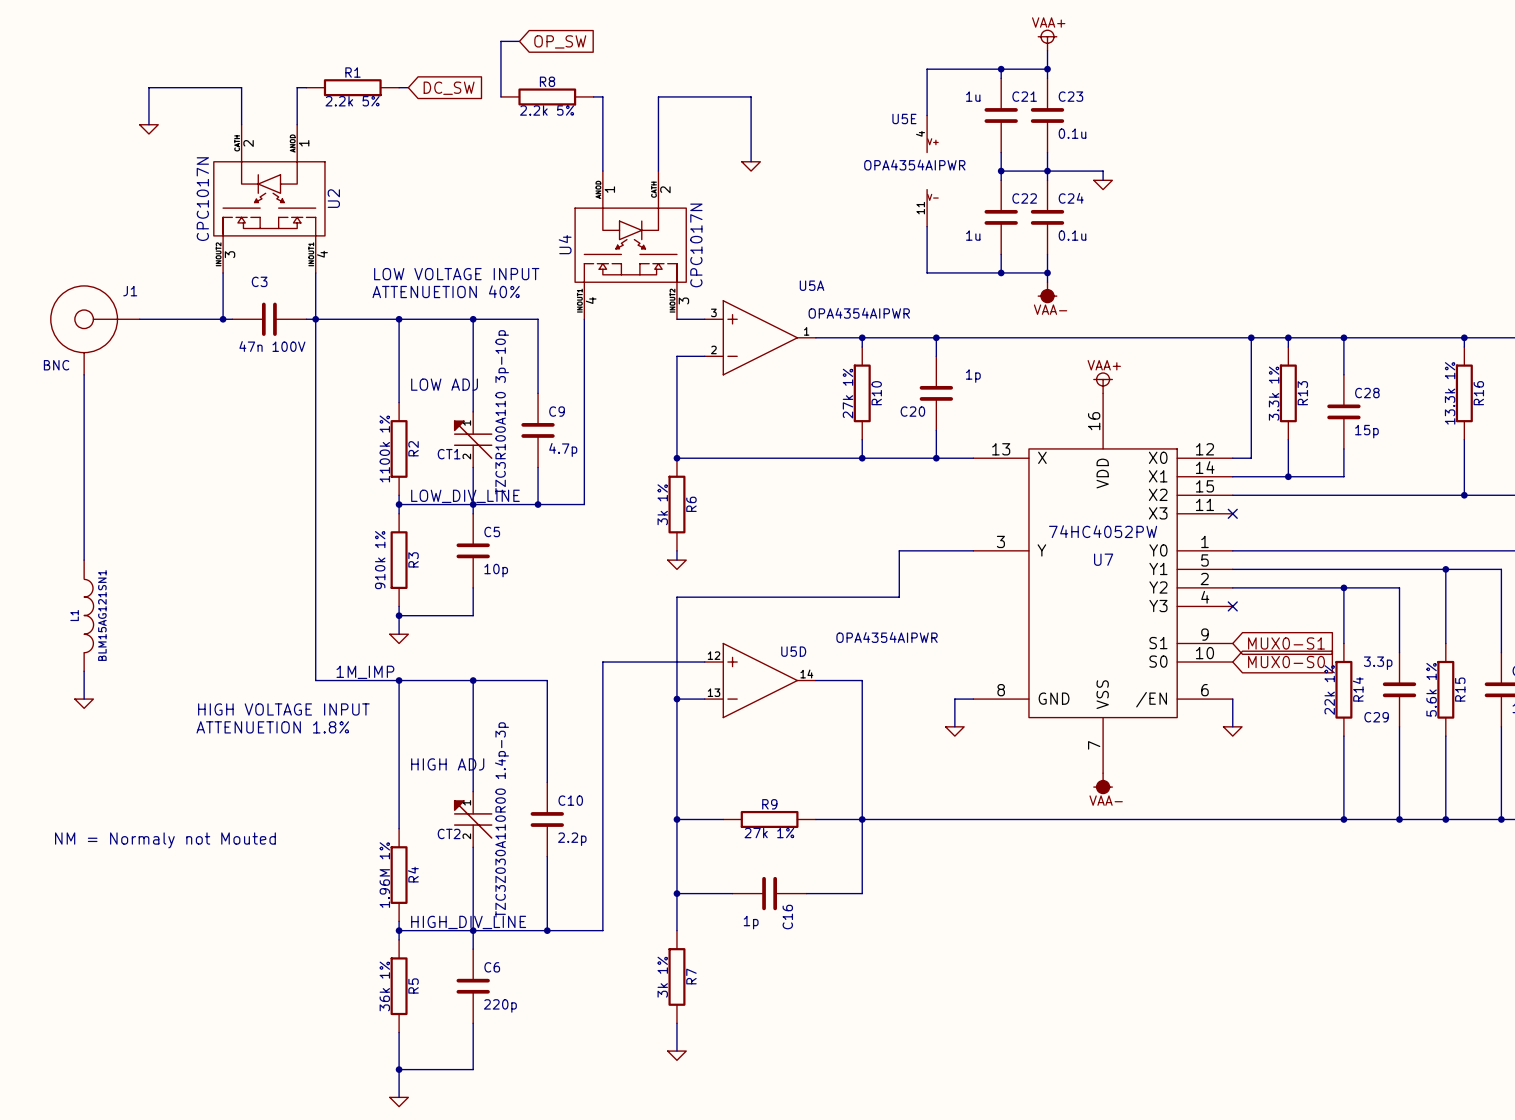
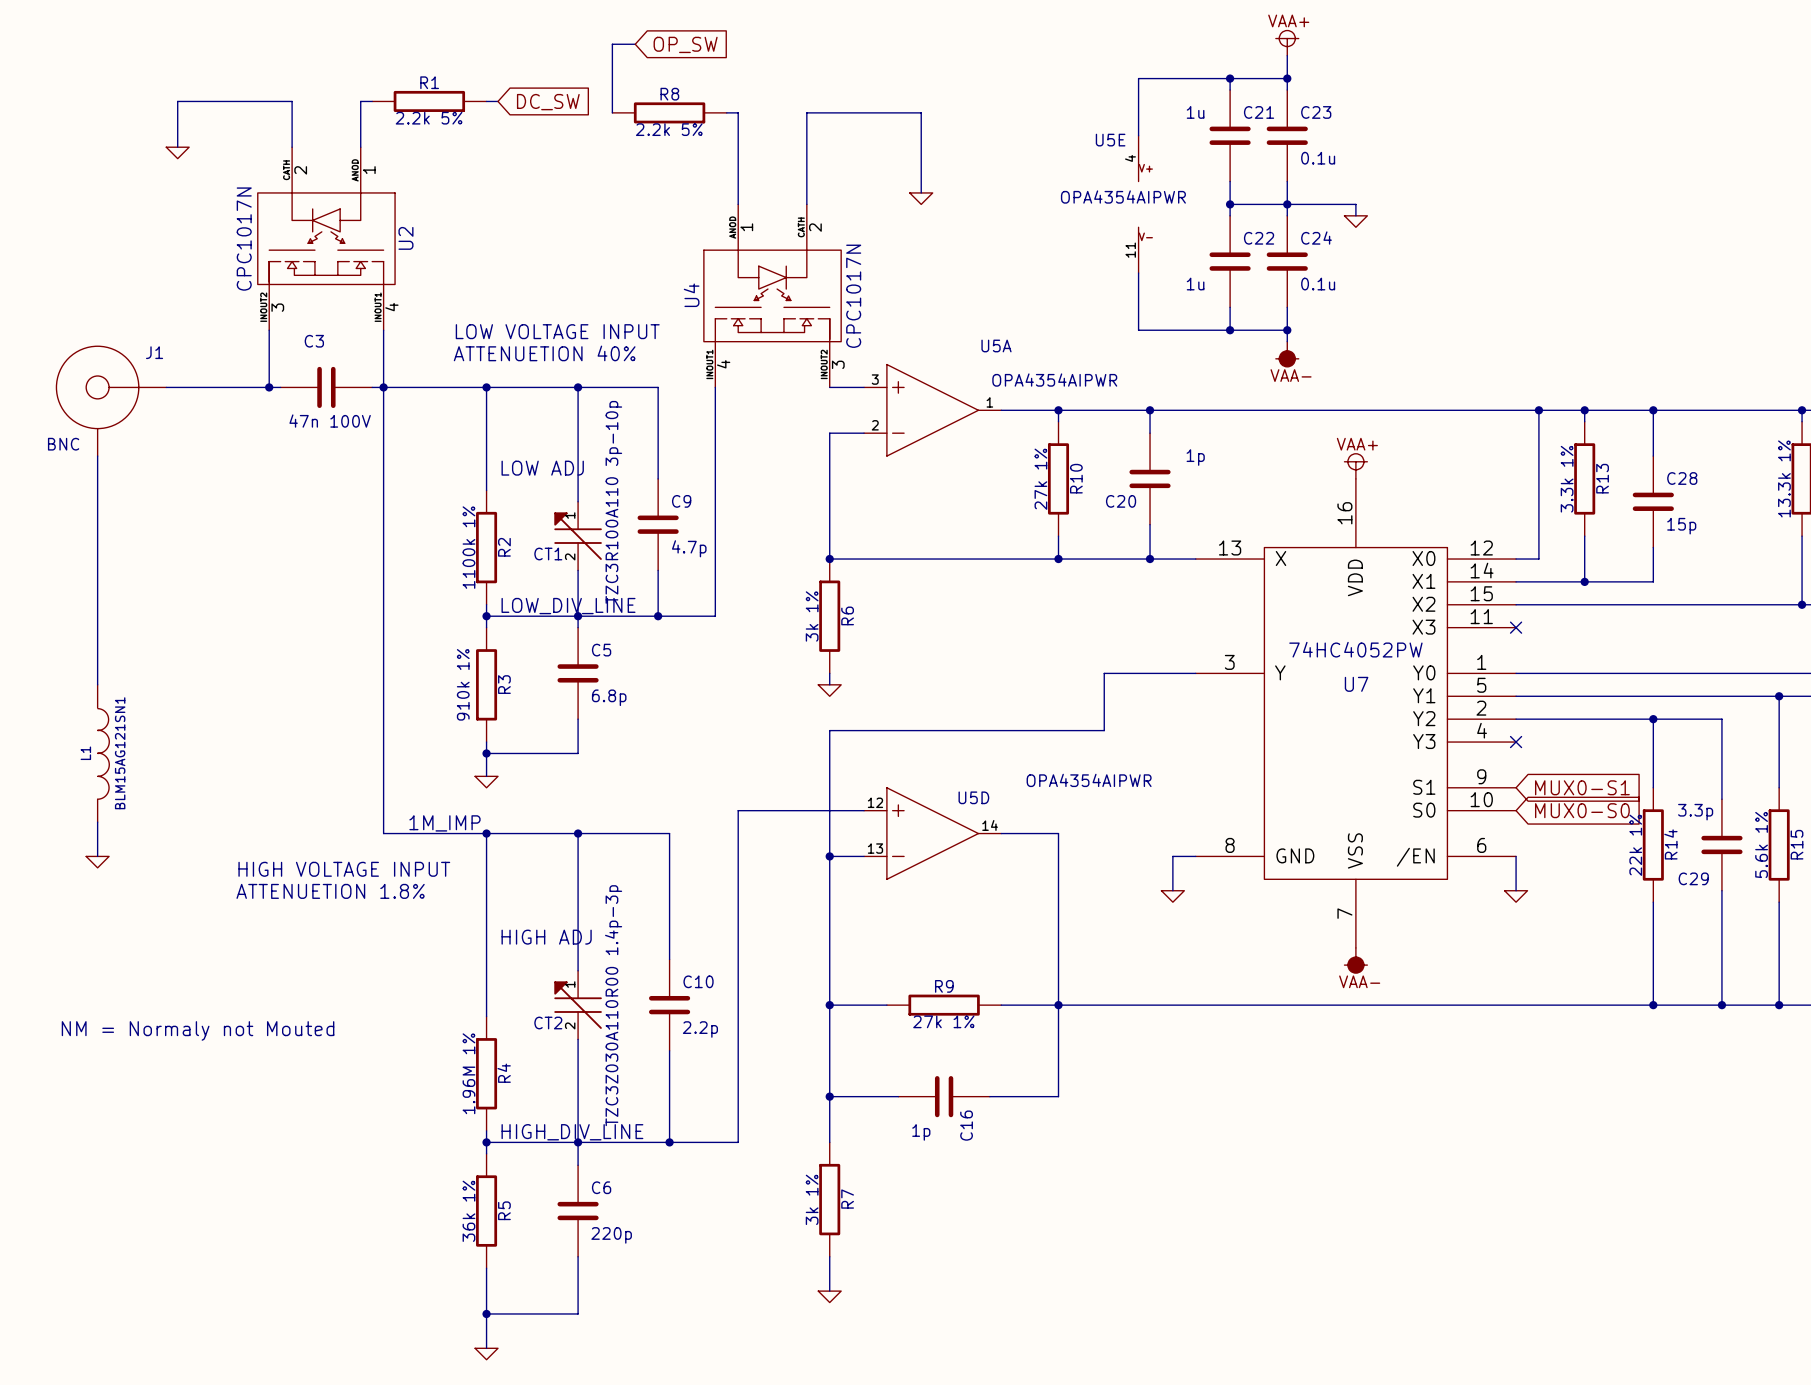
C5 value: 10p (496, 570) -> 6.8p (609, 697)

